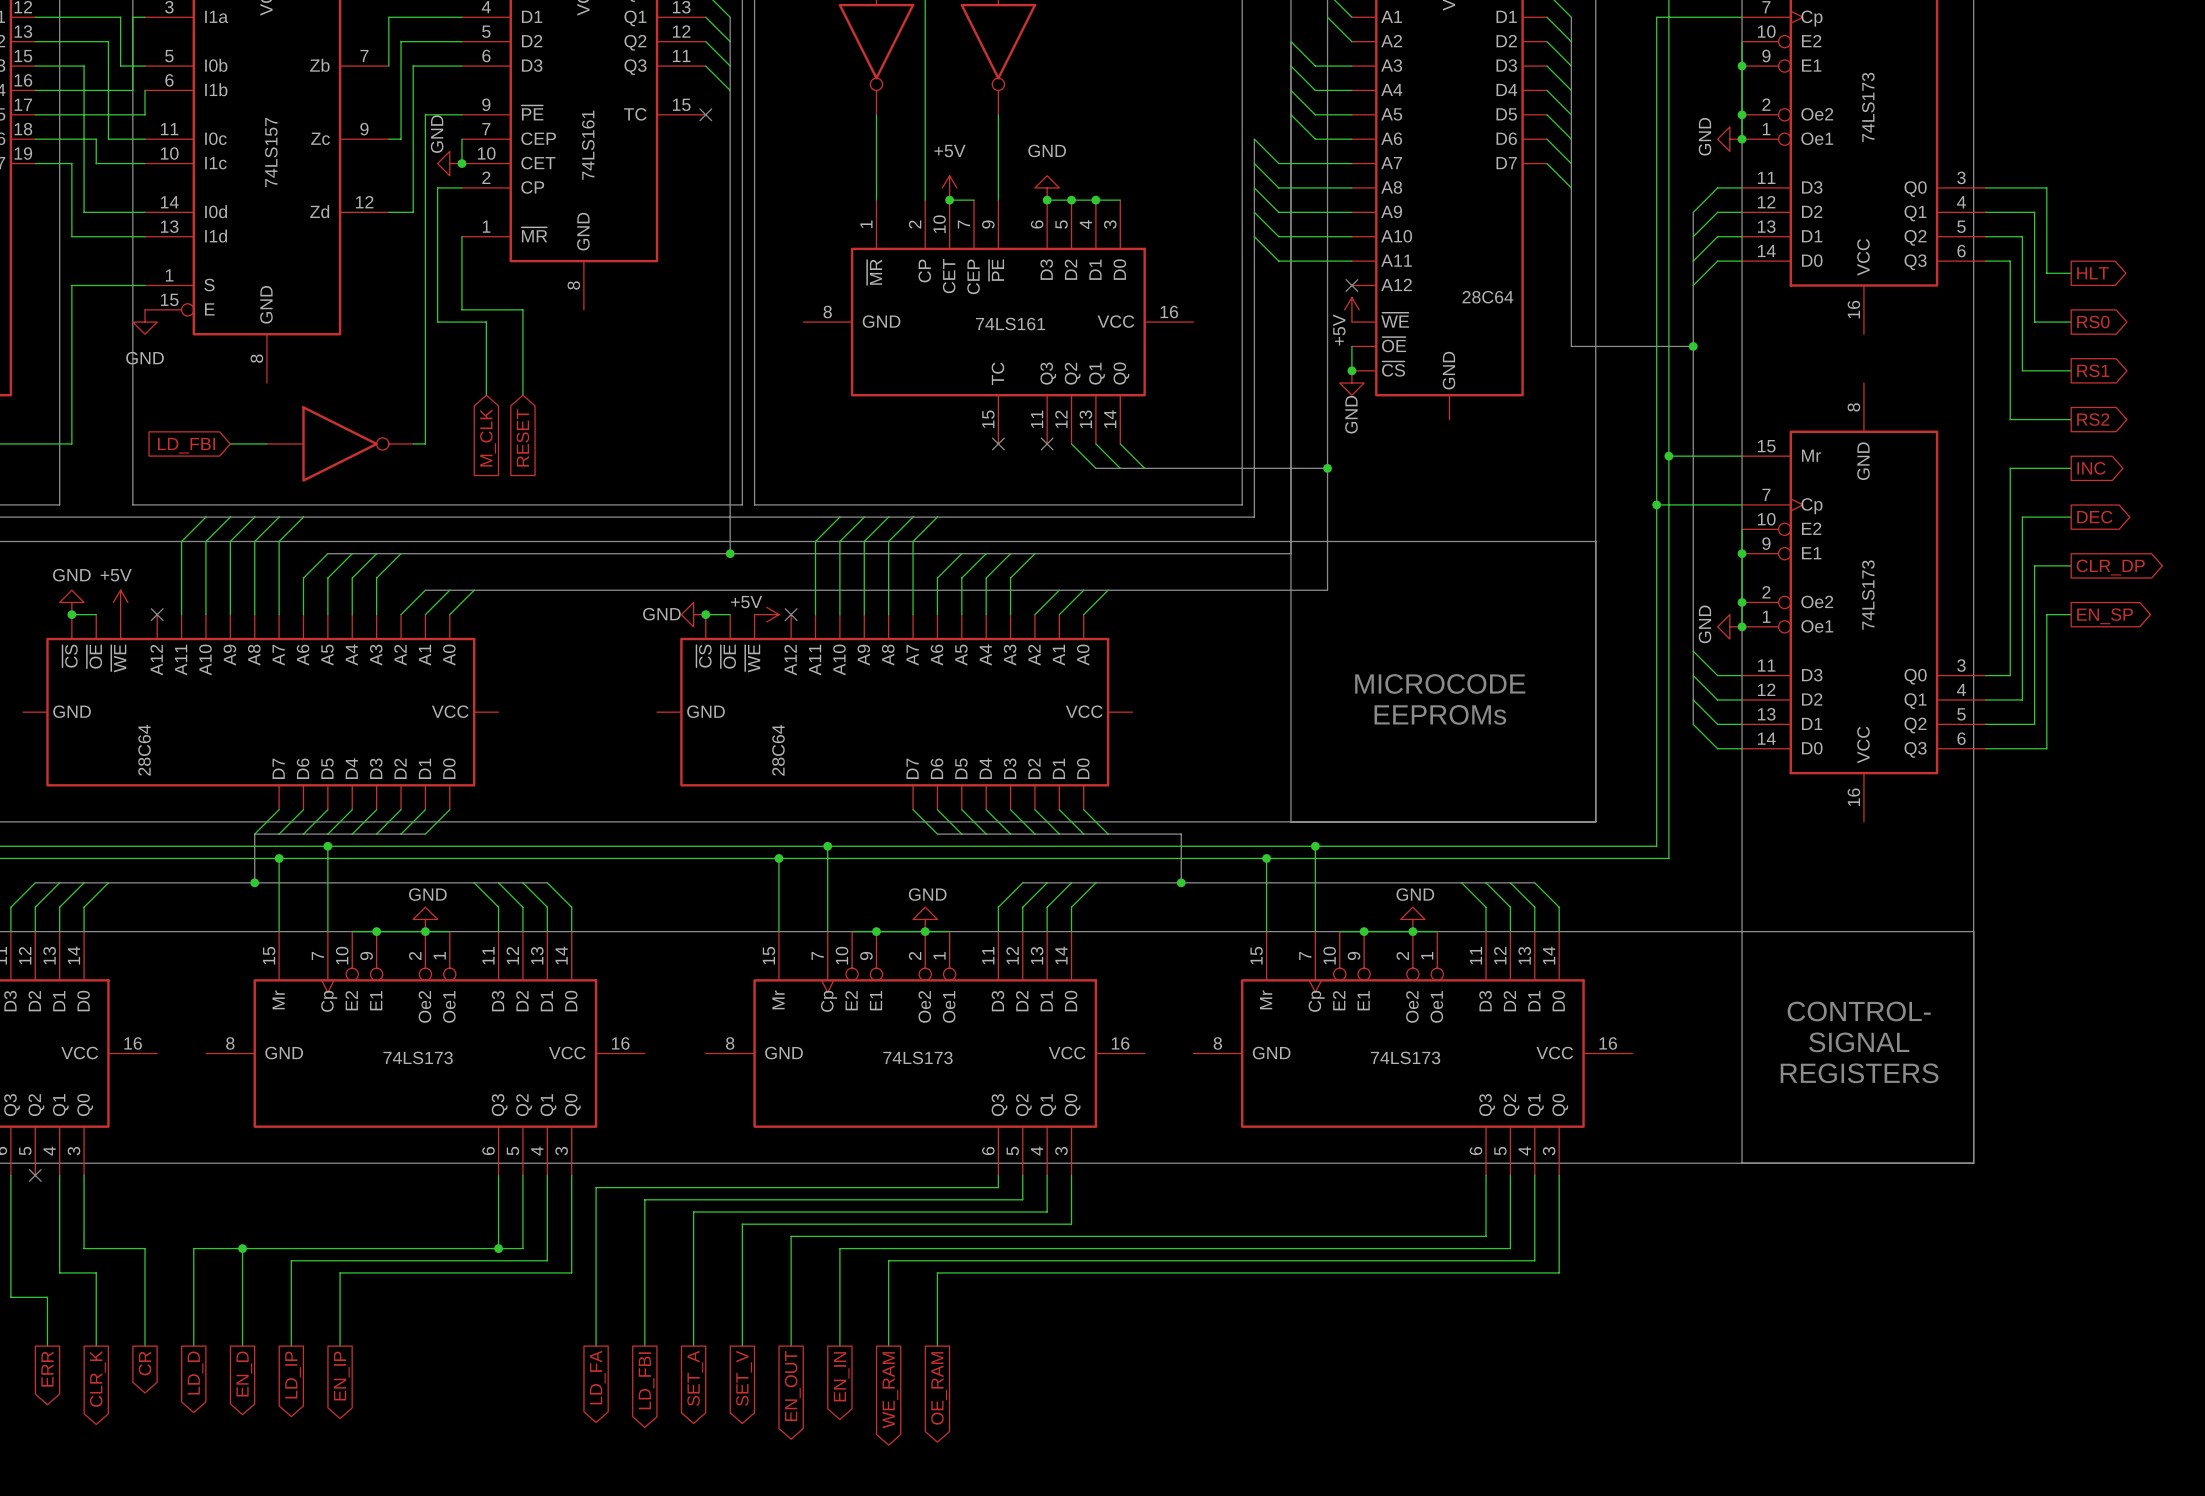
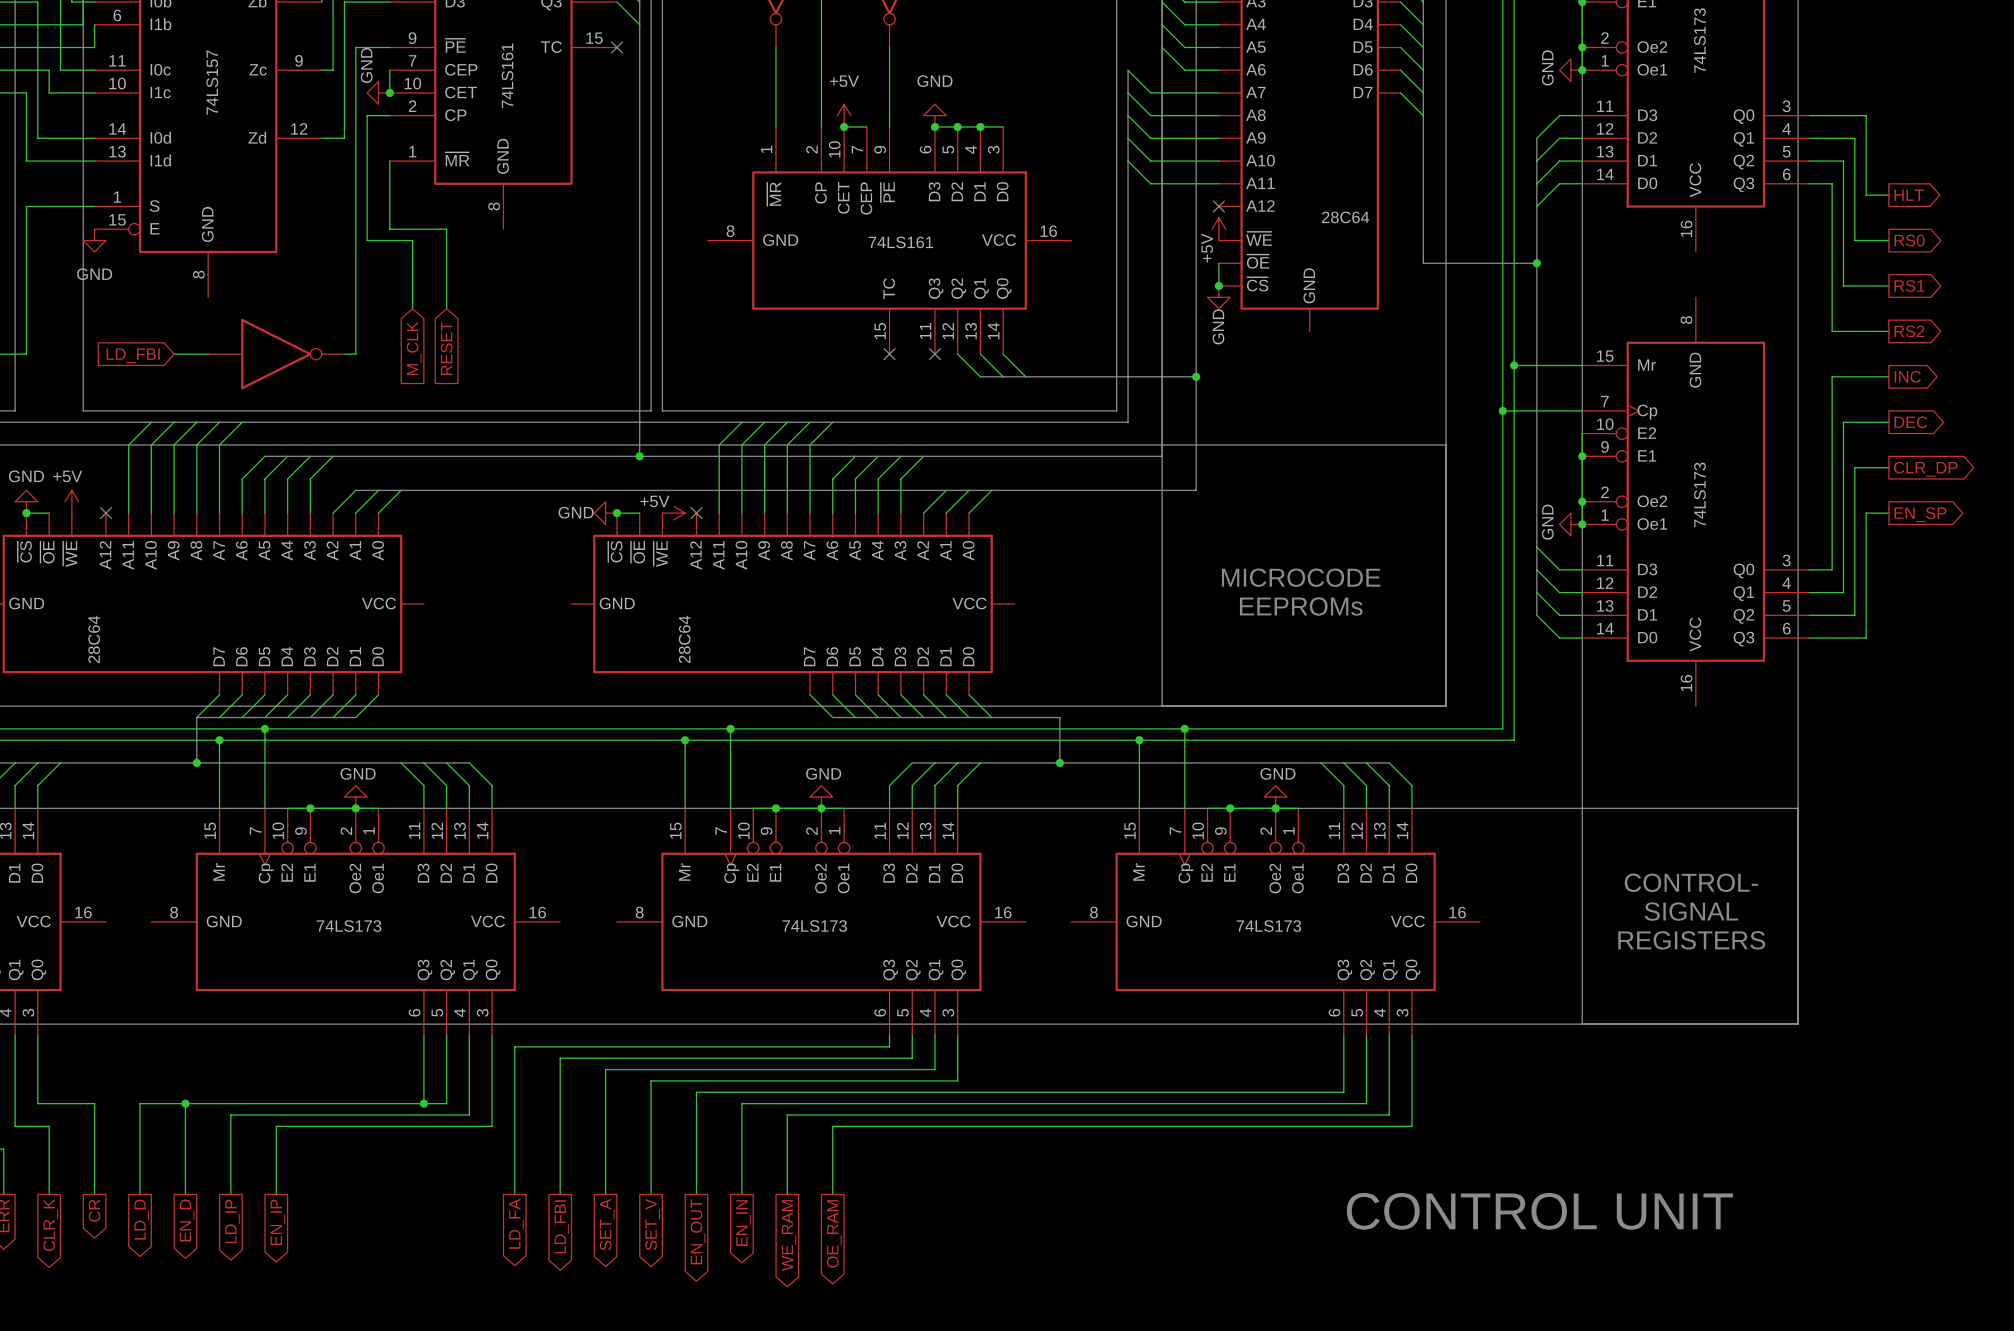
text: none -> CONTROL UNIT (1539, 1211)

